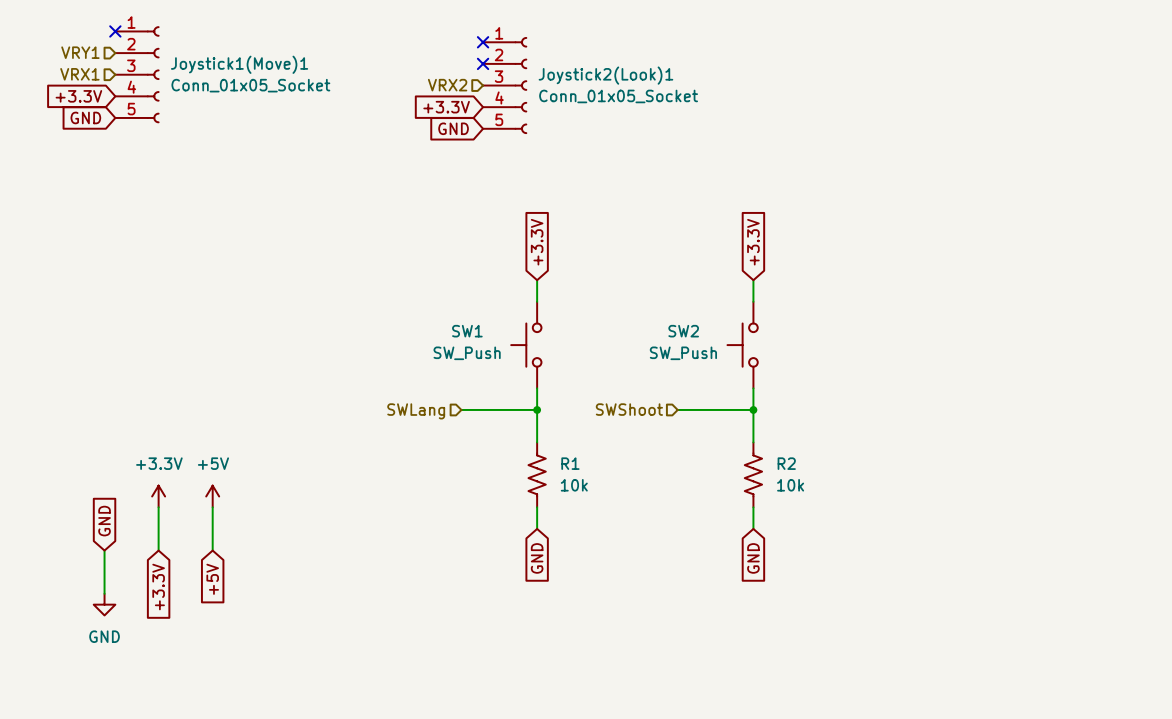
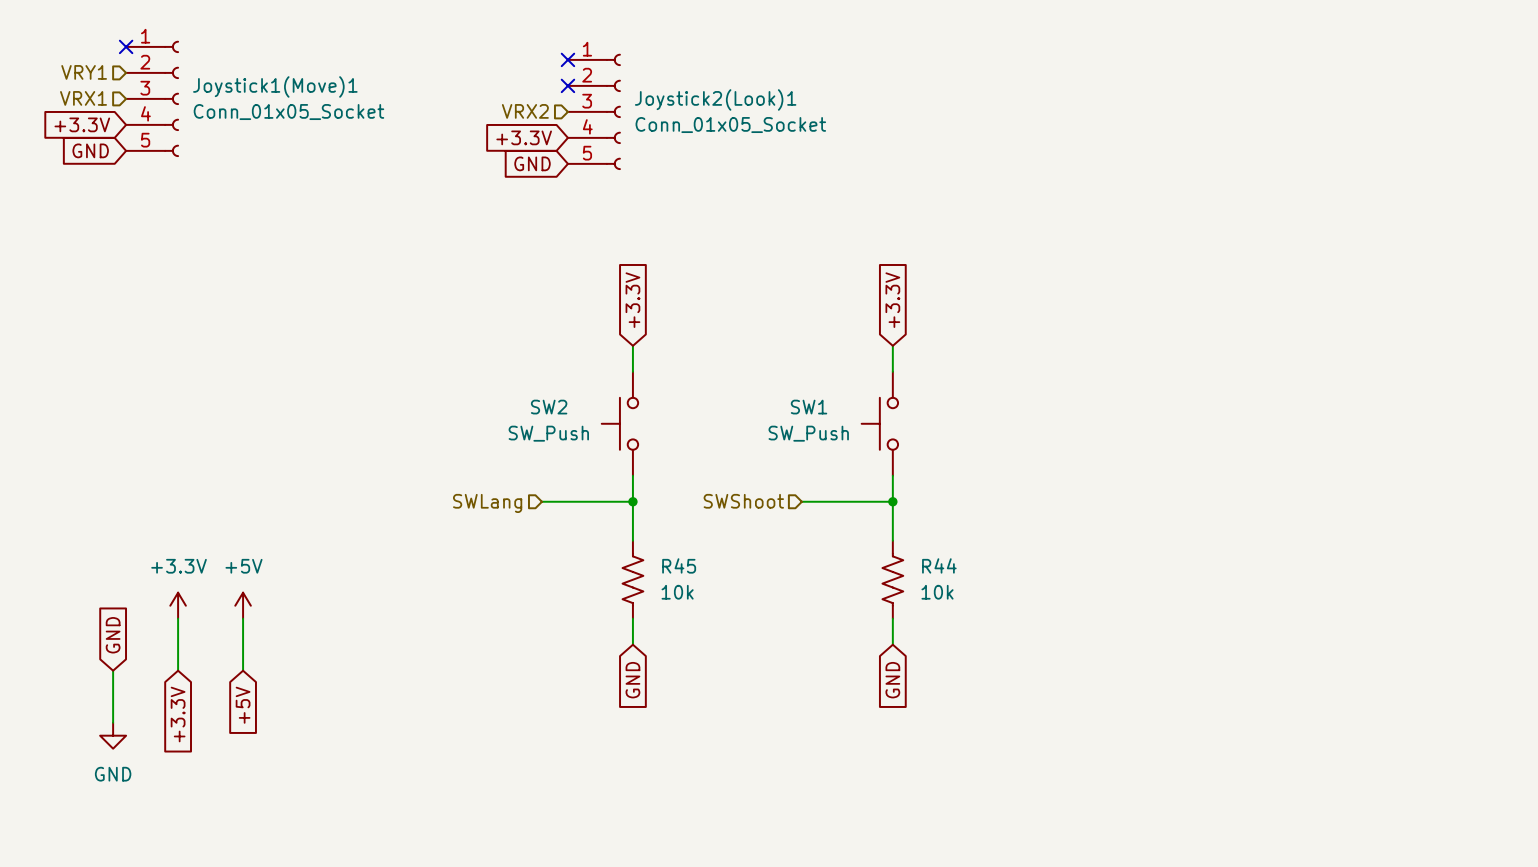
SW1 name: SW1 (467, 331) -> SW2 (549, 407)
SW2 name: SW2 (683, 331) -> SW1 (809, 407)
R1 name: R1 (570, 463) -> R45 (679, 565)
R2 name: R2 (786, 463) -> R44 (939, 565)

